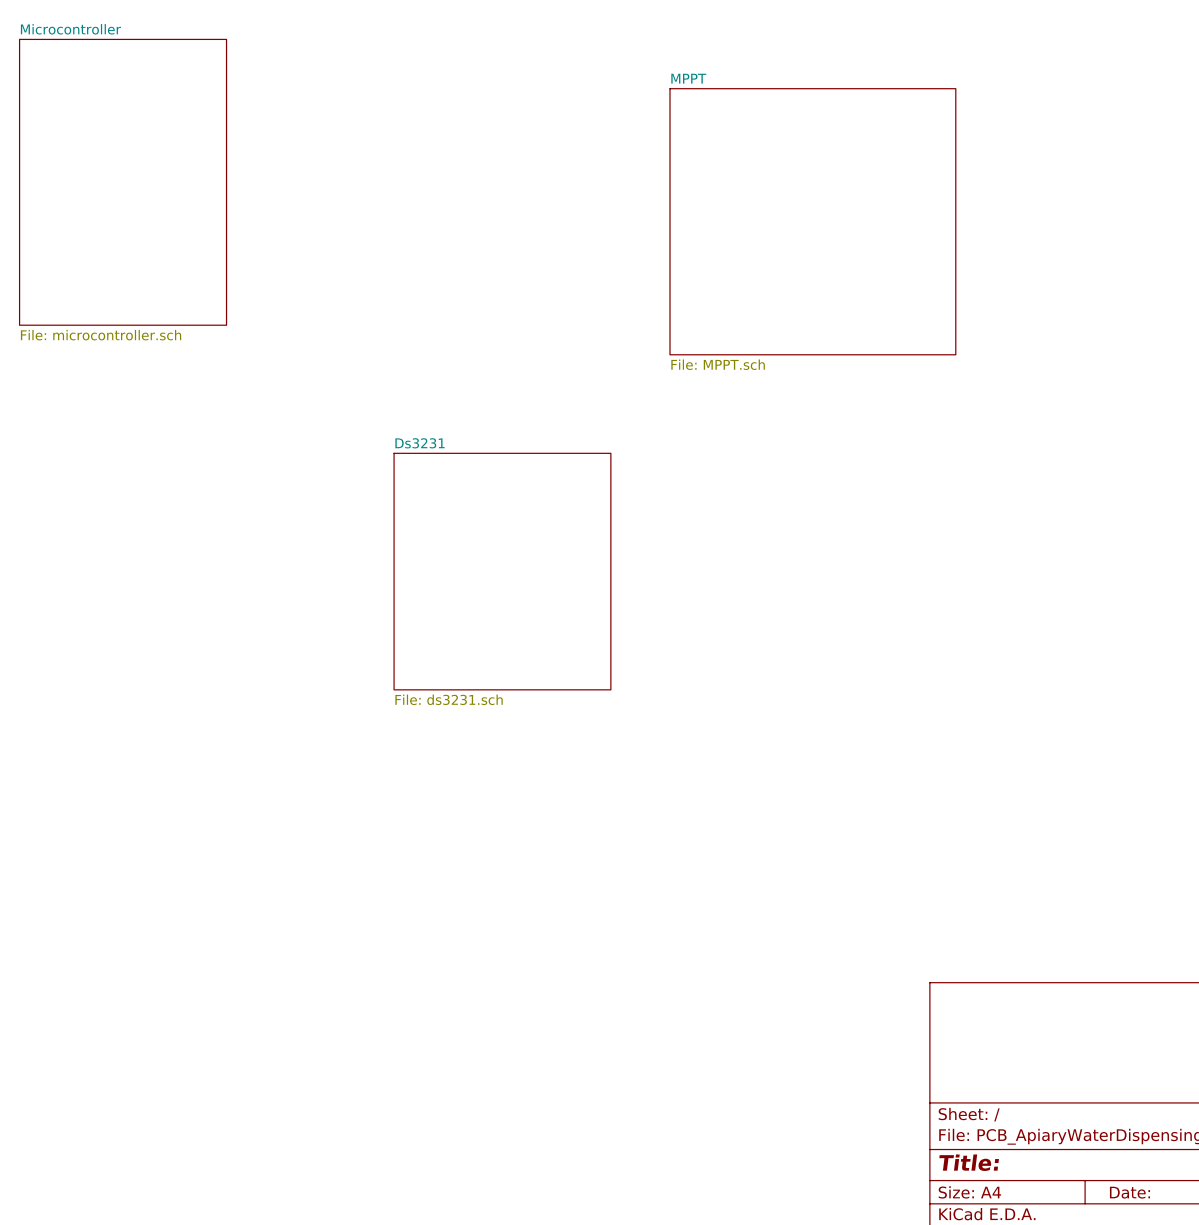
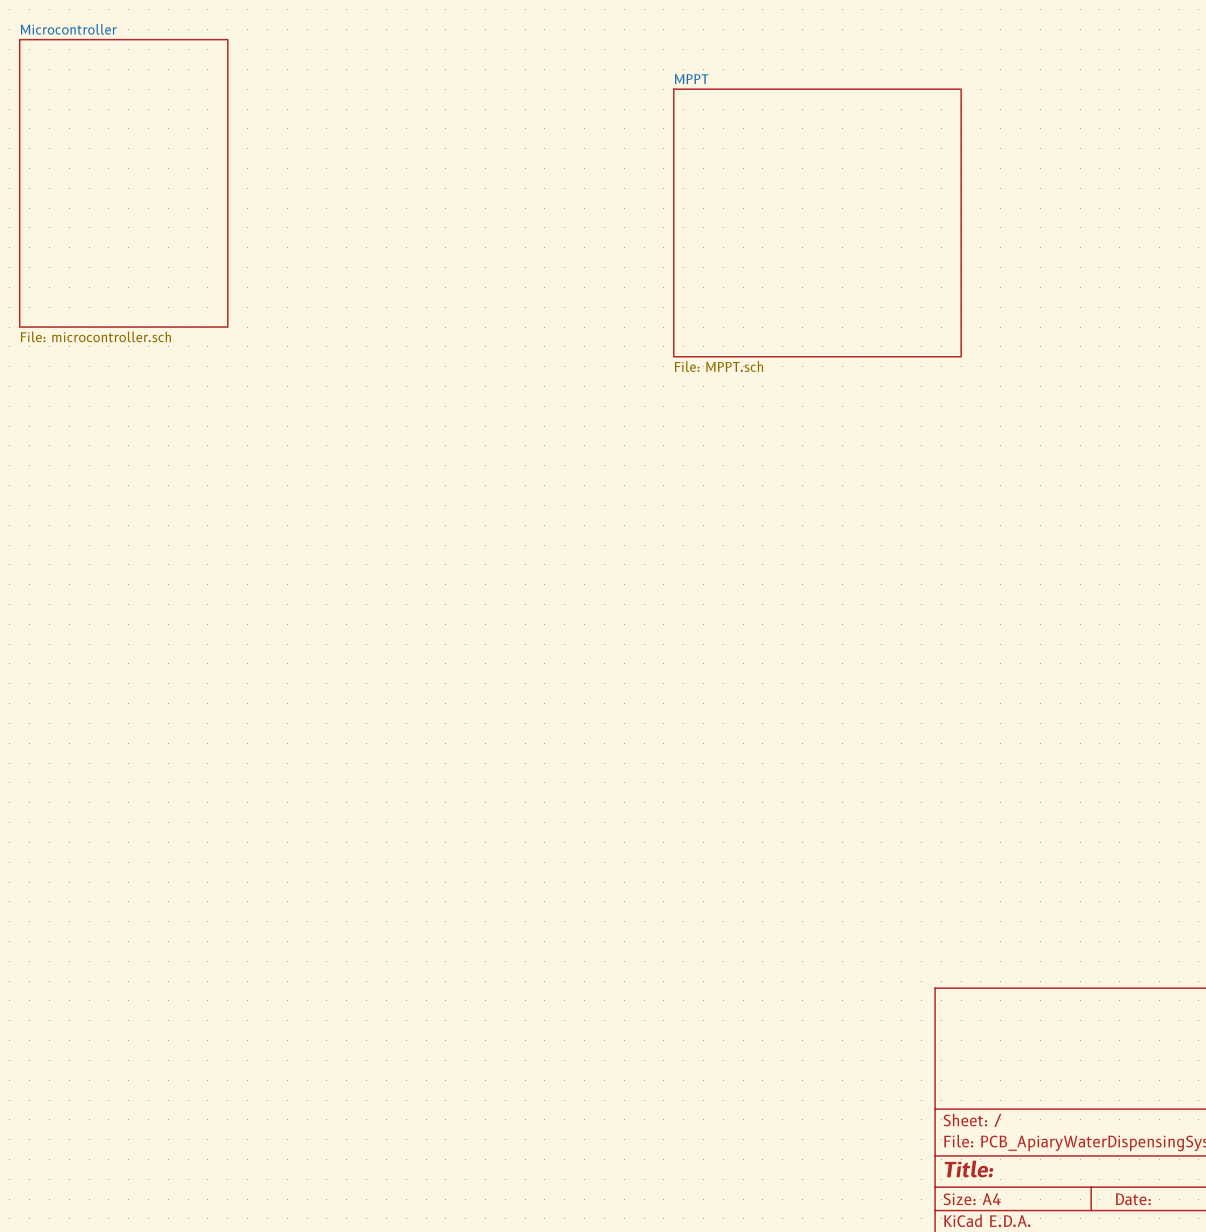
sheet Ds3231: File: ds3231.sch (502, 571) -> none

